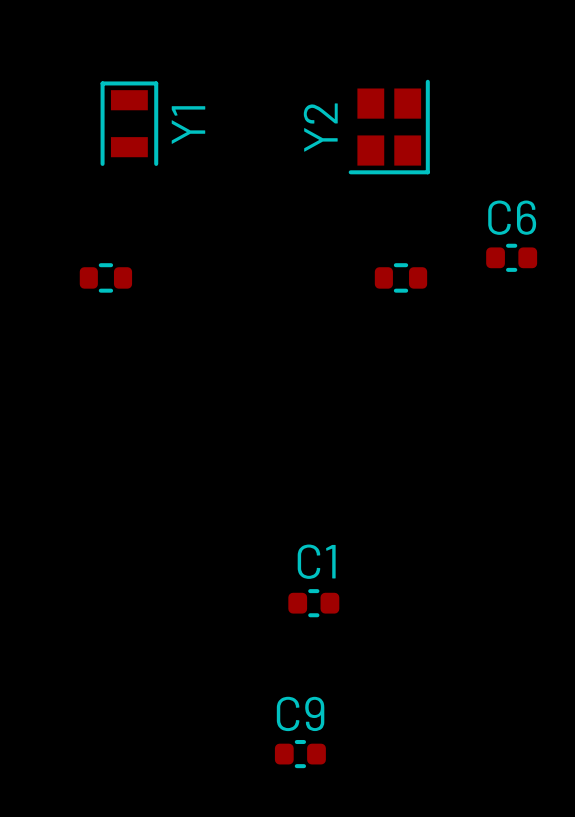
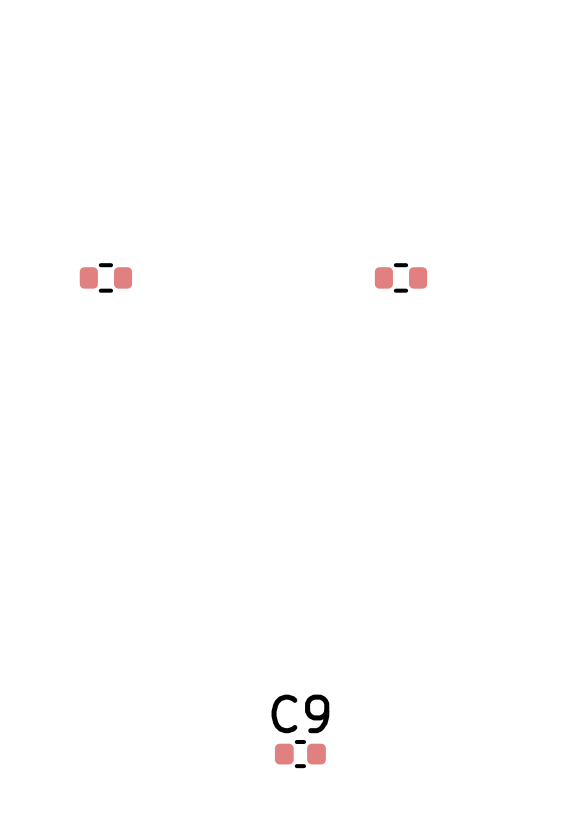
Y1: (129, 123) -> none
Y2: (389, 127) -> none
C6: (511, 257) -> none
C1: (313, 603) -> none

